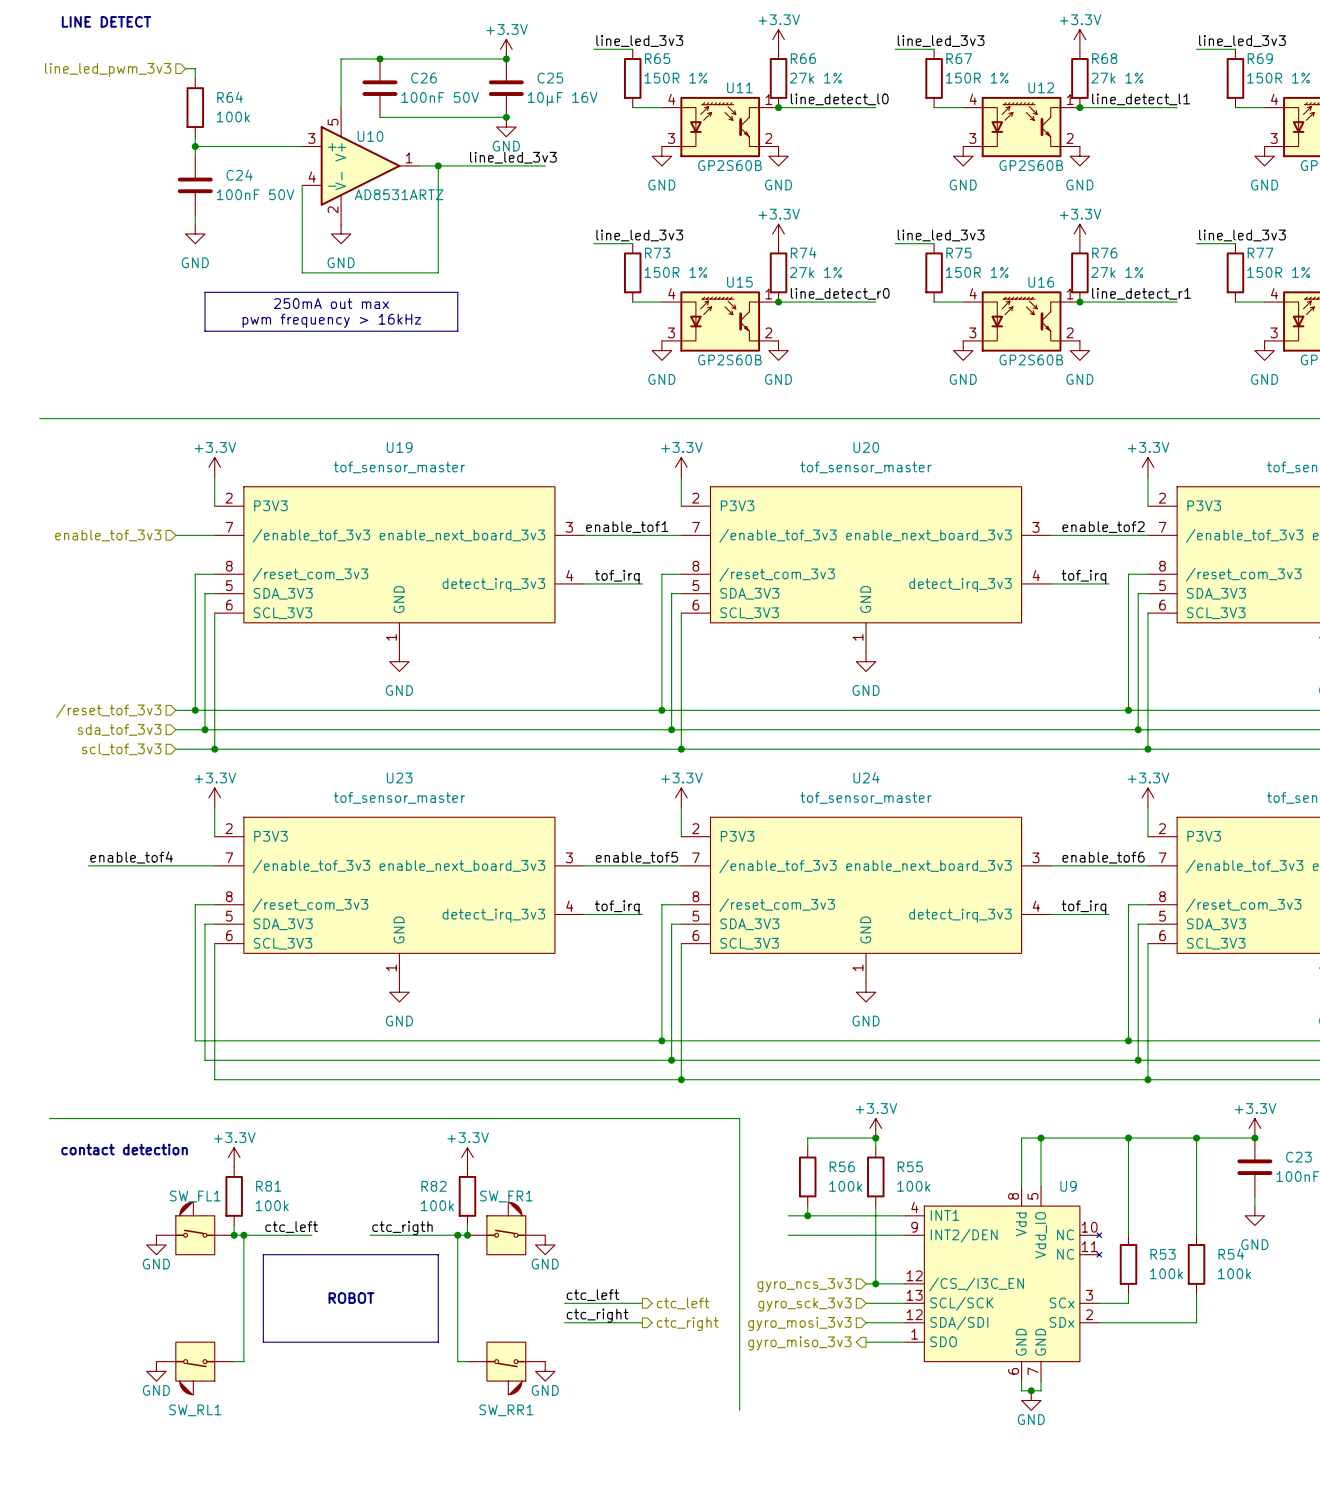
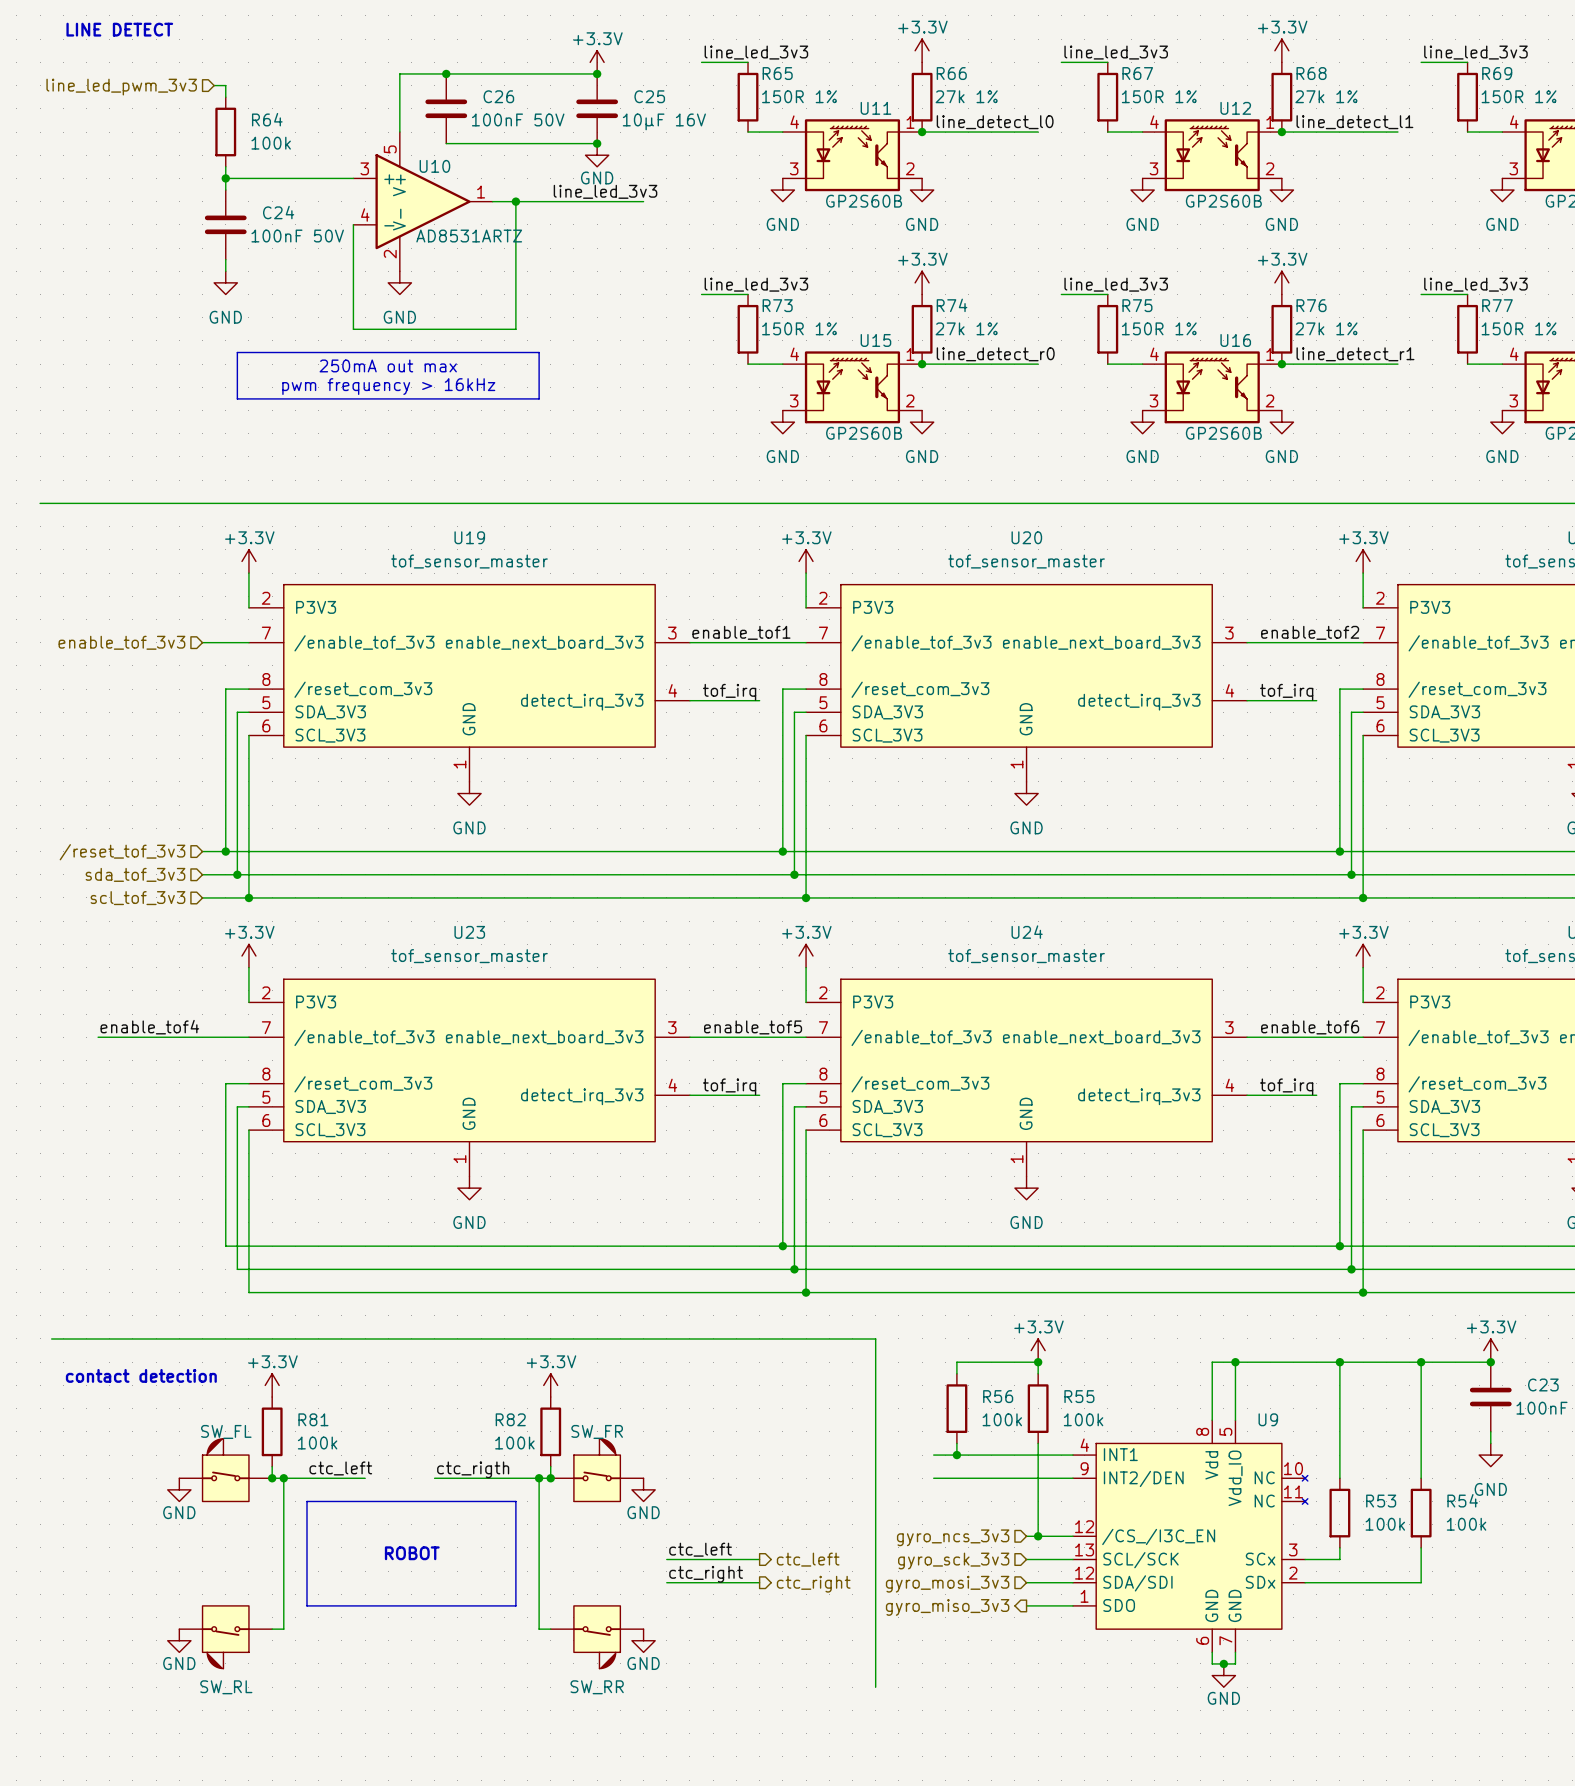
SW_FL1 name: SW_FL1 (195, 1196) -> SW_FL (226, 1431)
SW_FR1 name: SW_FR1 (506, 1196) -> SW_FR (597, 1431)
SW_RL1 name: SW_RL1 (195, 1410) -> SW_RL (226, 1687)
SW_RR1 name: SW_RR1 (506, 1410) -> SW_RR (597, 1687)

